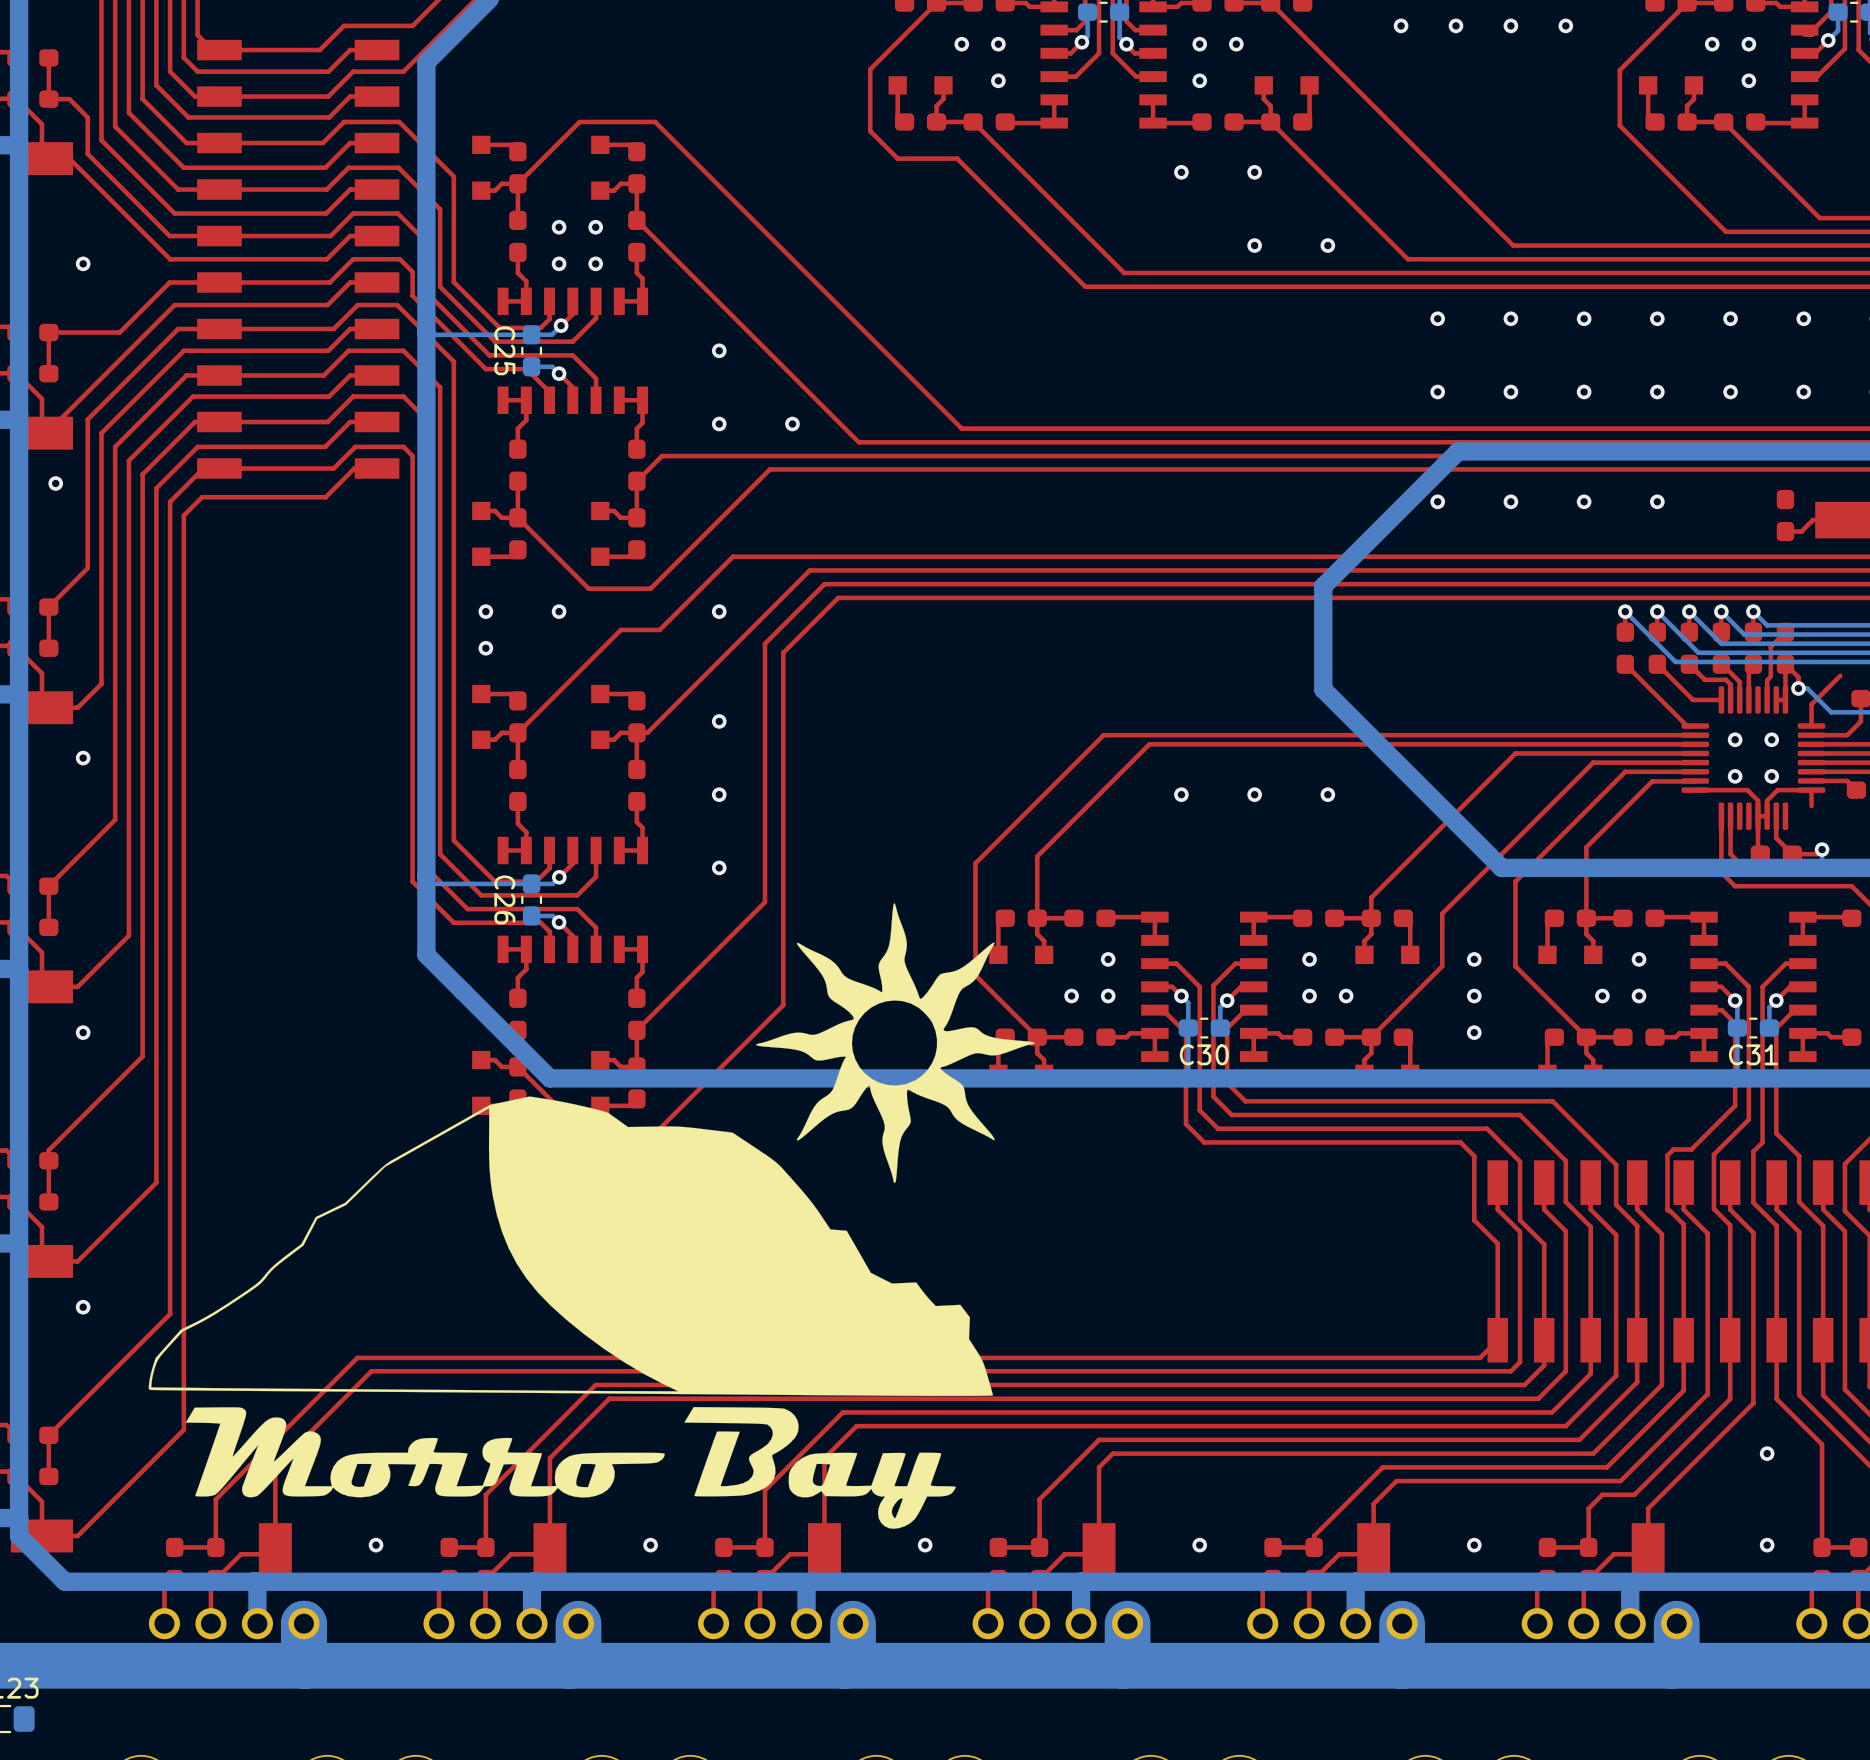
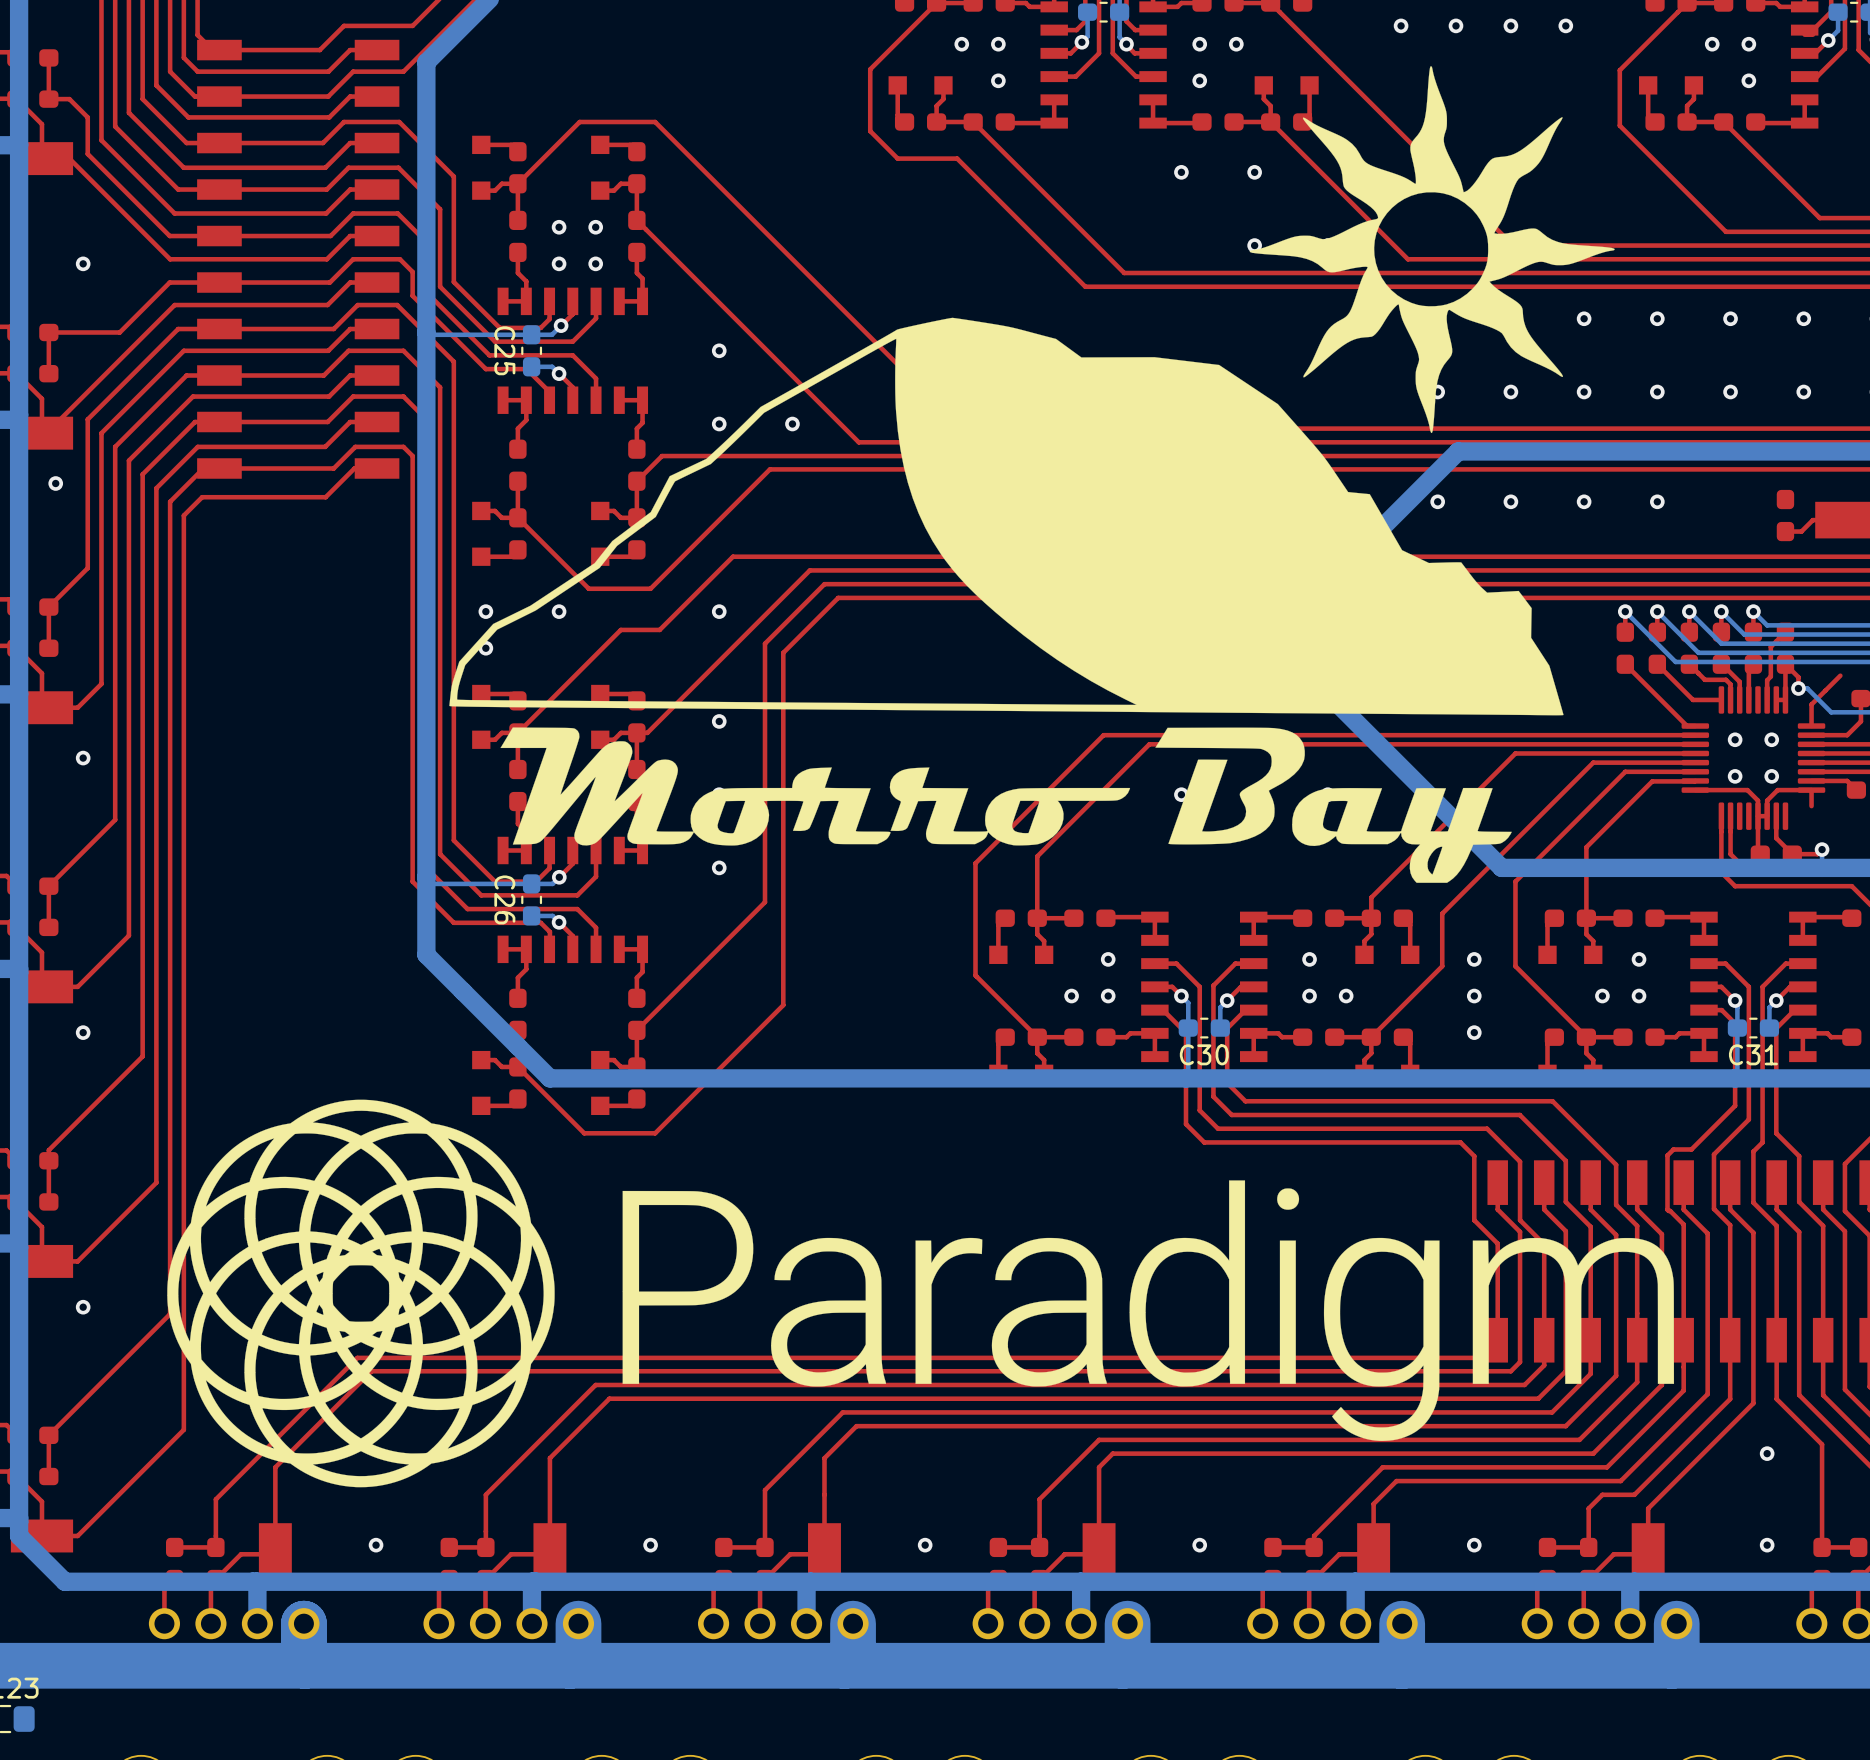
drawing: none -> [449, 66, 1615, 883]
drawing: [148, 903, 1035, 1529] -> none
drawing: none -> [167, 1099, 1675, 1488]

